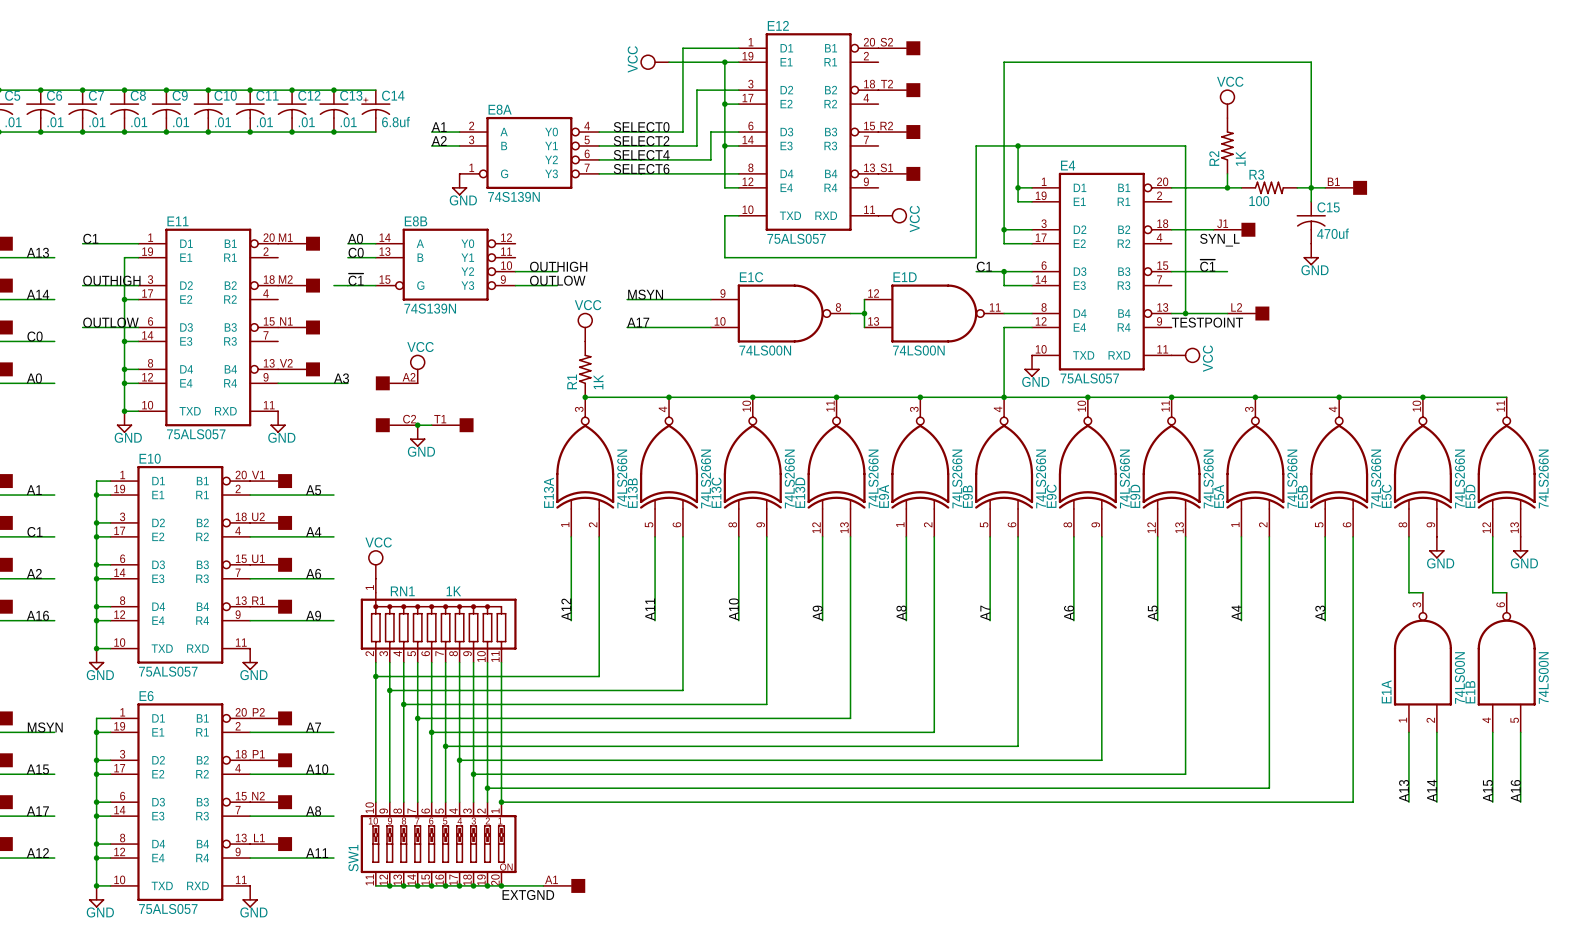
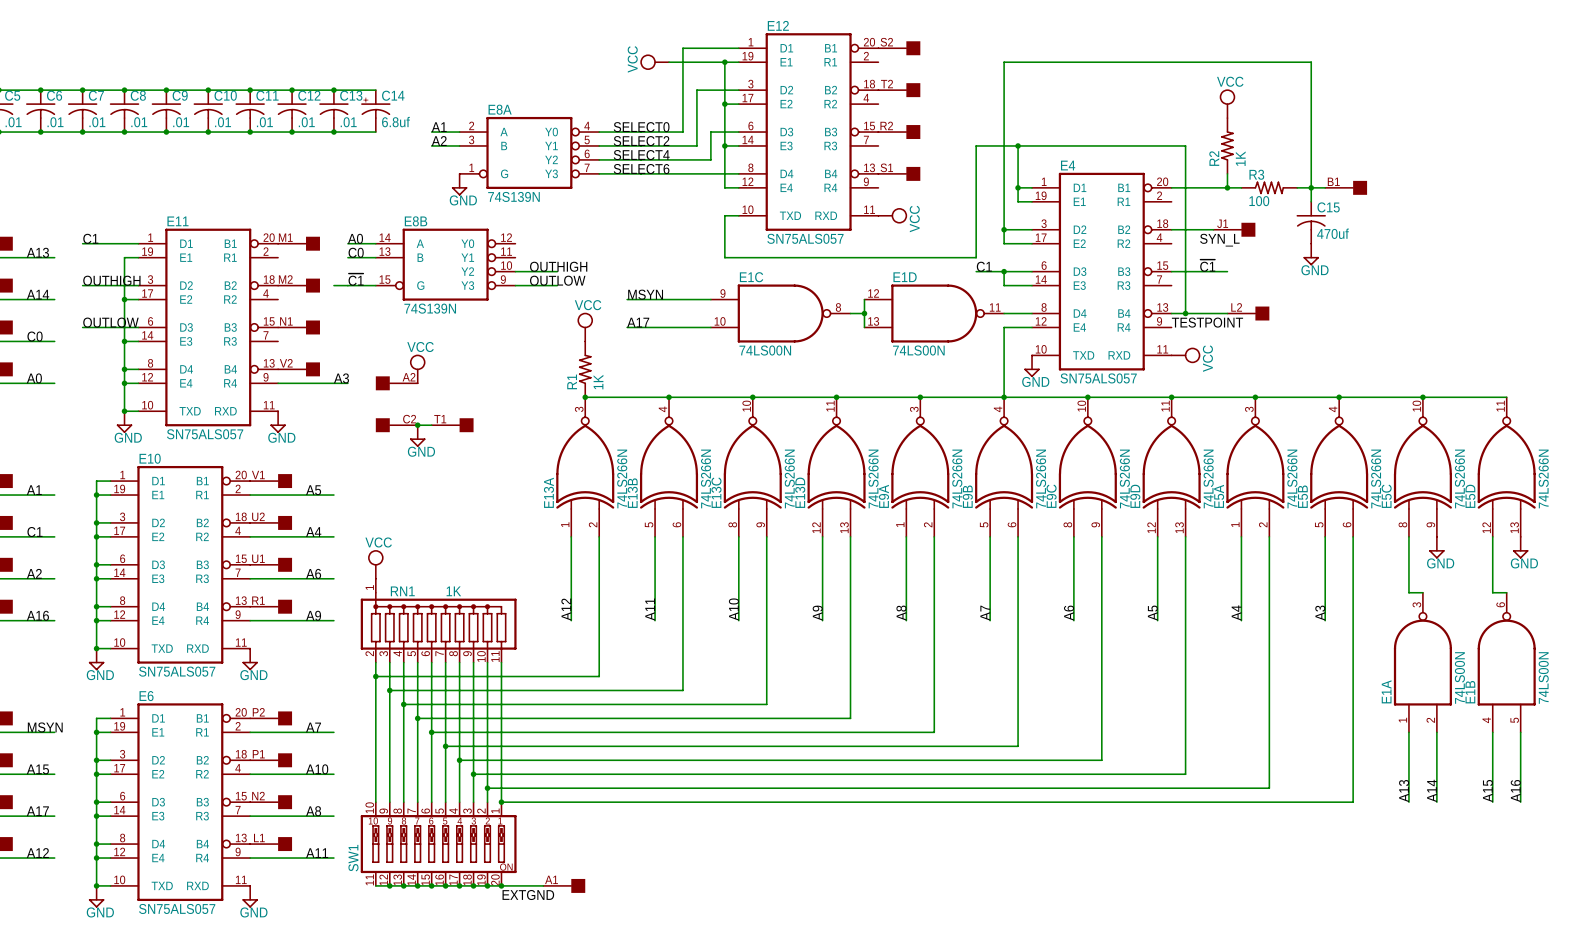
E12 value: 75ALS057 (796, 238) -> SN75ALS057 (805, 238)
E4 value: 75ALS057 (1089, 378) -> SN75ALS057 (1098, 378)
E11 value: 75ALS057 (196, 434) -> SN75ALS057 (205, 434)
E10 value: 75ALS057 (168, 671) -> SN75ALS057 (177, 671)
E6 value: 75ALS057 (168, 908) -> SN75ALS057 (177, 908)

